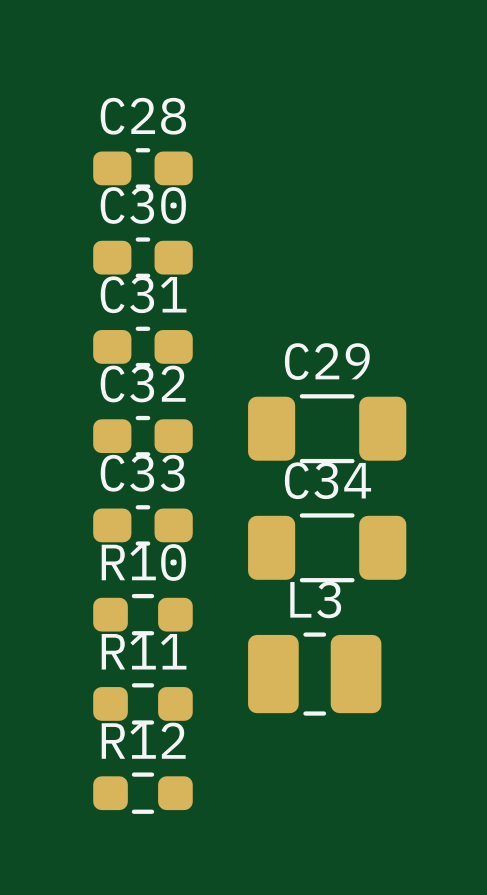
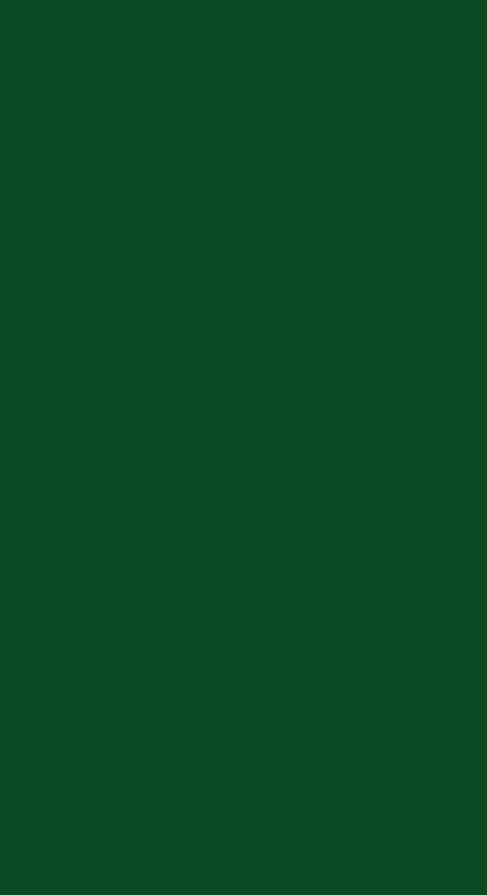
C28: (142, 168) -> none
C30: (142, 257) -> none
C31: (142, 346) -> none
C29: (327, 428) -> none
C32: (142, 436) -> none
C33: (142, 525) -> none
C34: (327, 547) -> none
R10: (142, 614) -> none
L3: (314, 674) -> none
R11: (142, 703) -> none
R12: (142, 793) -> none

